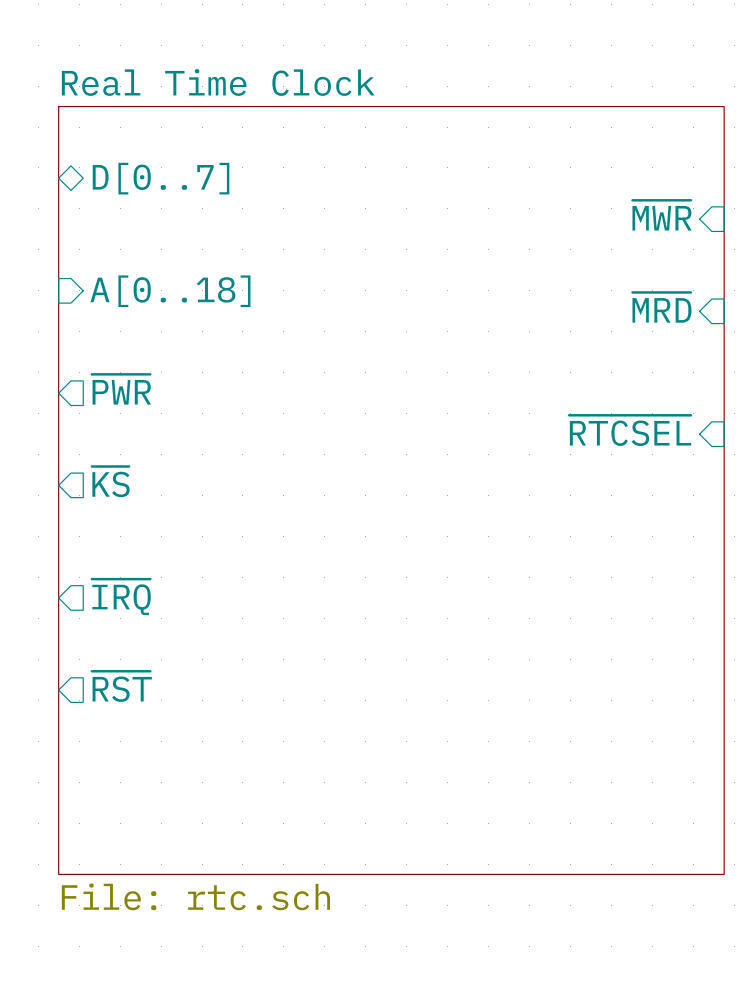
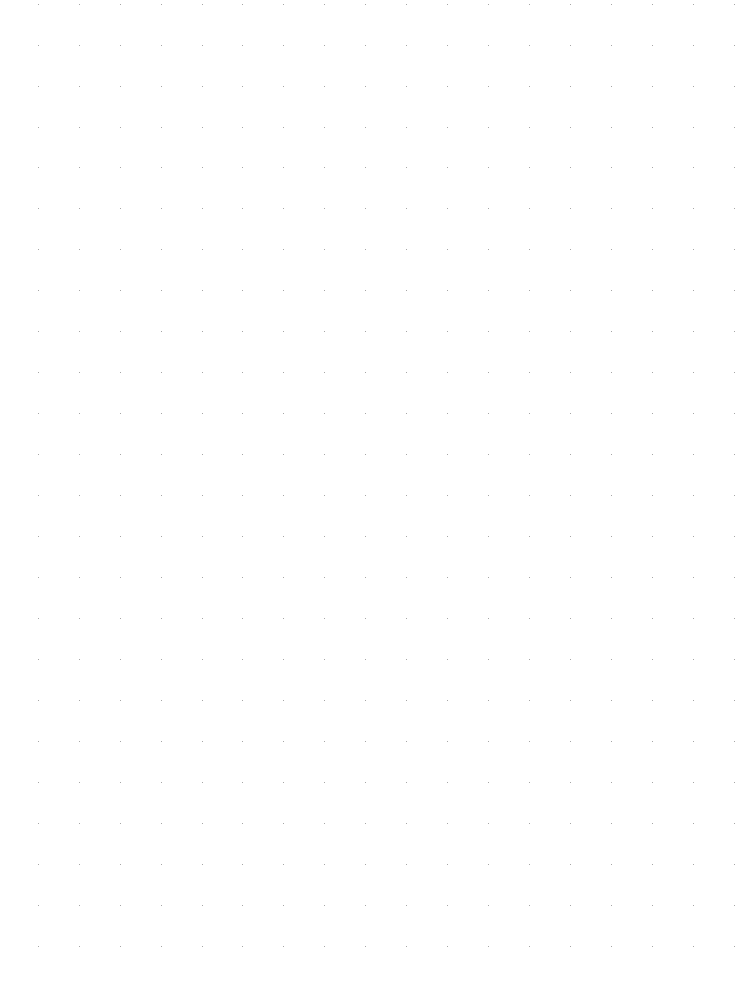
sheet pin: D[0..7] (161, 178) -> none
sheet pin: ~{MWR} (662, 215) -> none
sheet pin: A[0..18] (170, 291) -> none
sheet pin: ~{MRD} (661, 307) -> none
sheet pin: ~{PWR} (121, 389) -> none
sheet pin: ~{RTCSEL} (630, 430) -> none
sheet pin: ~{KS} (110, 481) -> none
sheet Real Time Clock: File: rtc.sch (391, 490) -> none
sheet pin: ~{IRQ} (121, 597) -> none
sheet pin: ~{RST} (121, 686) -> none

